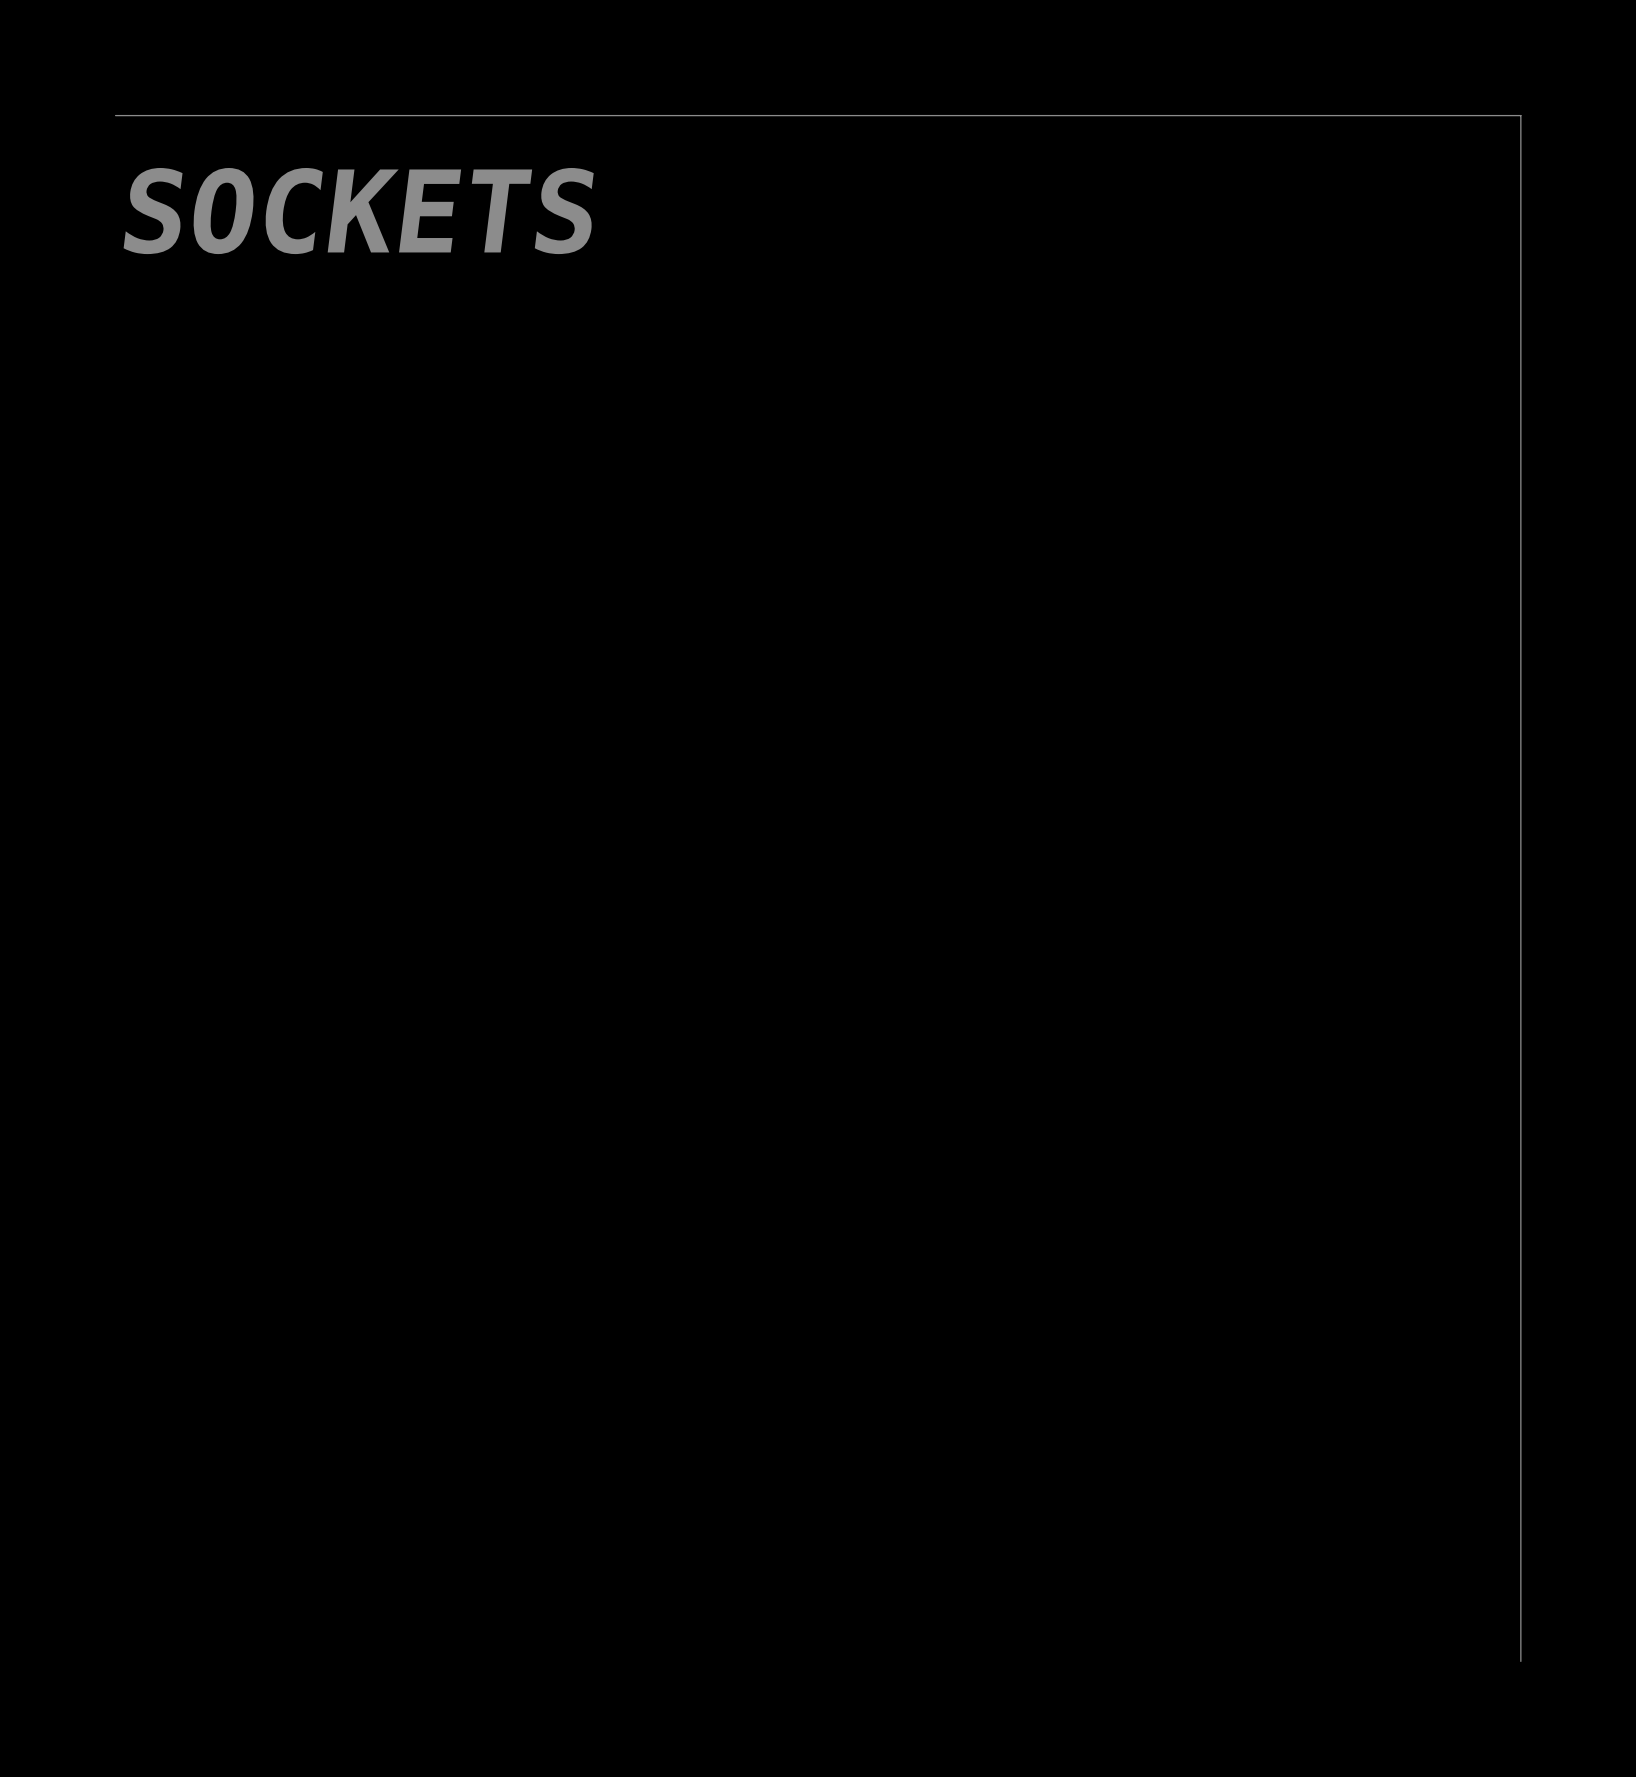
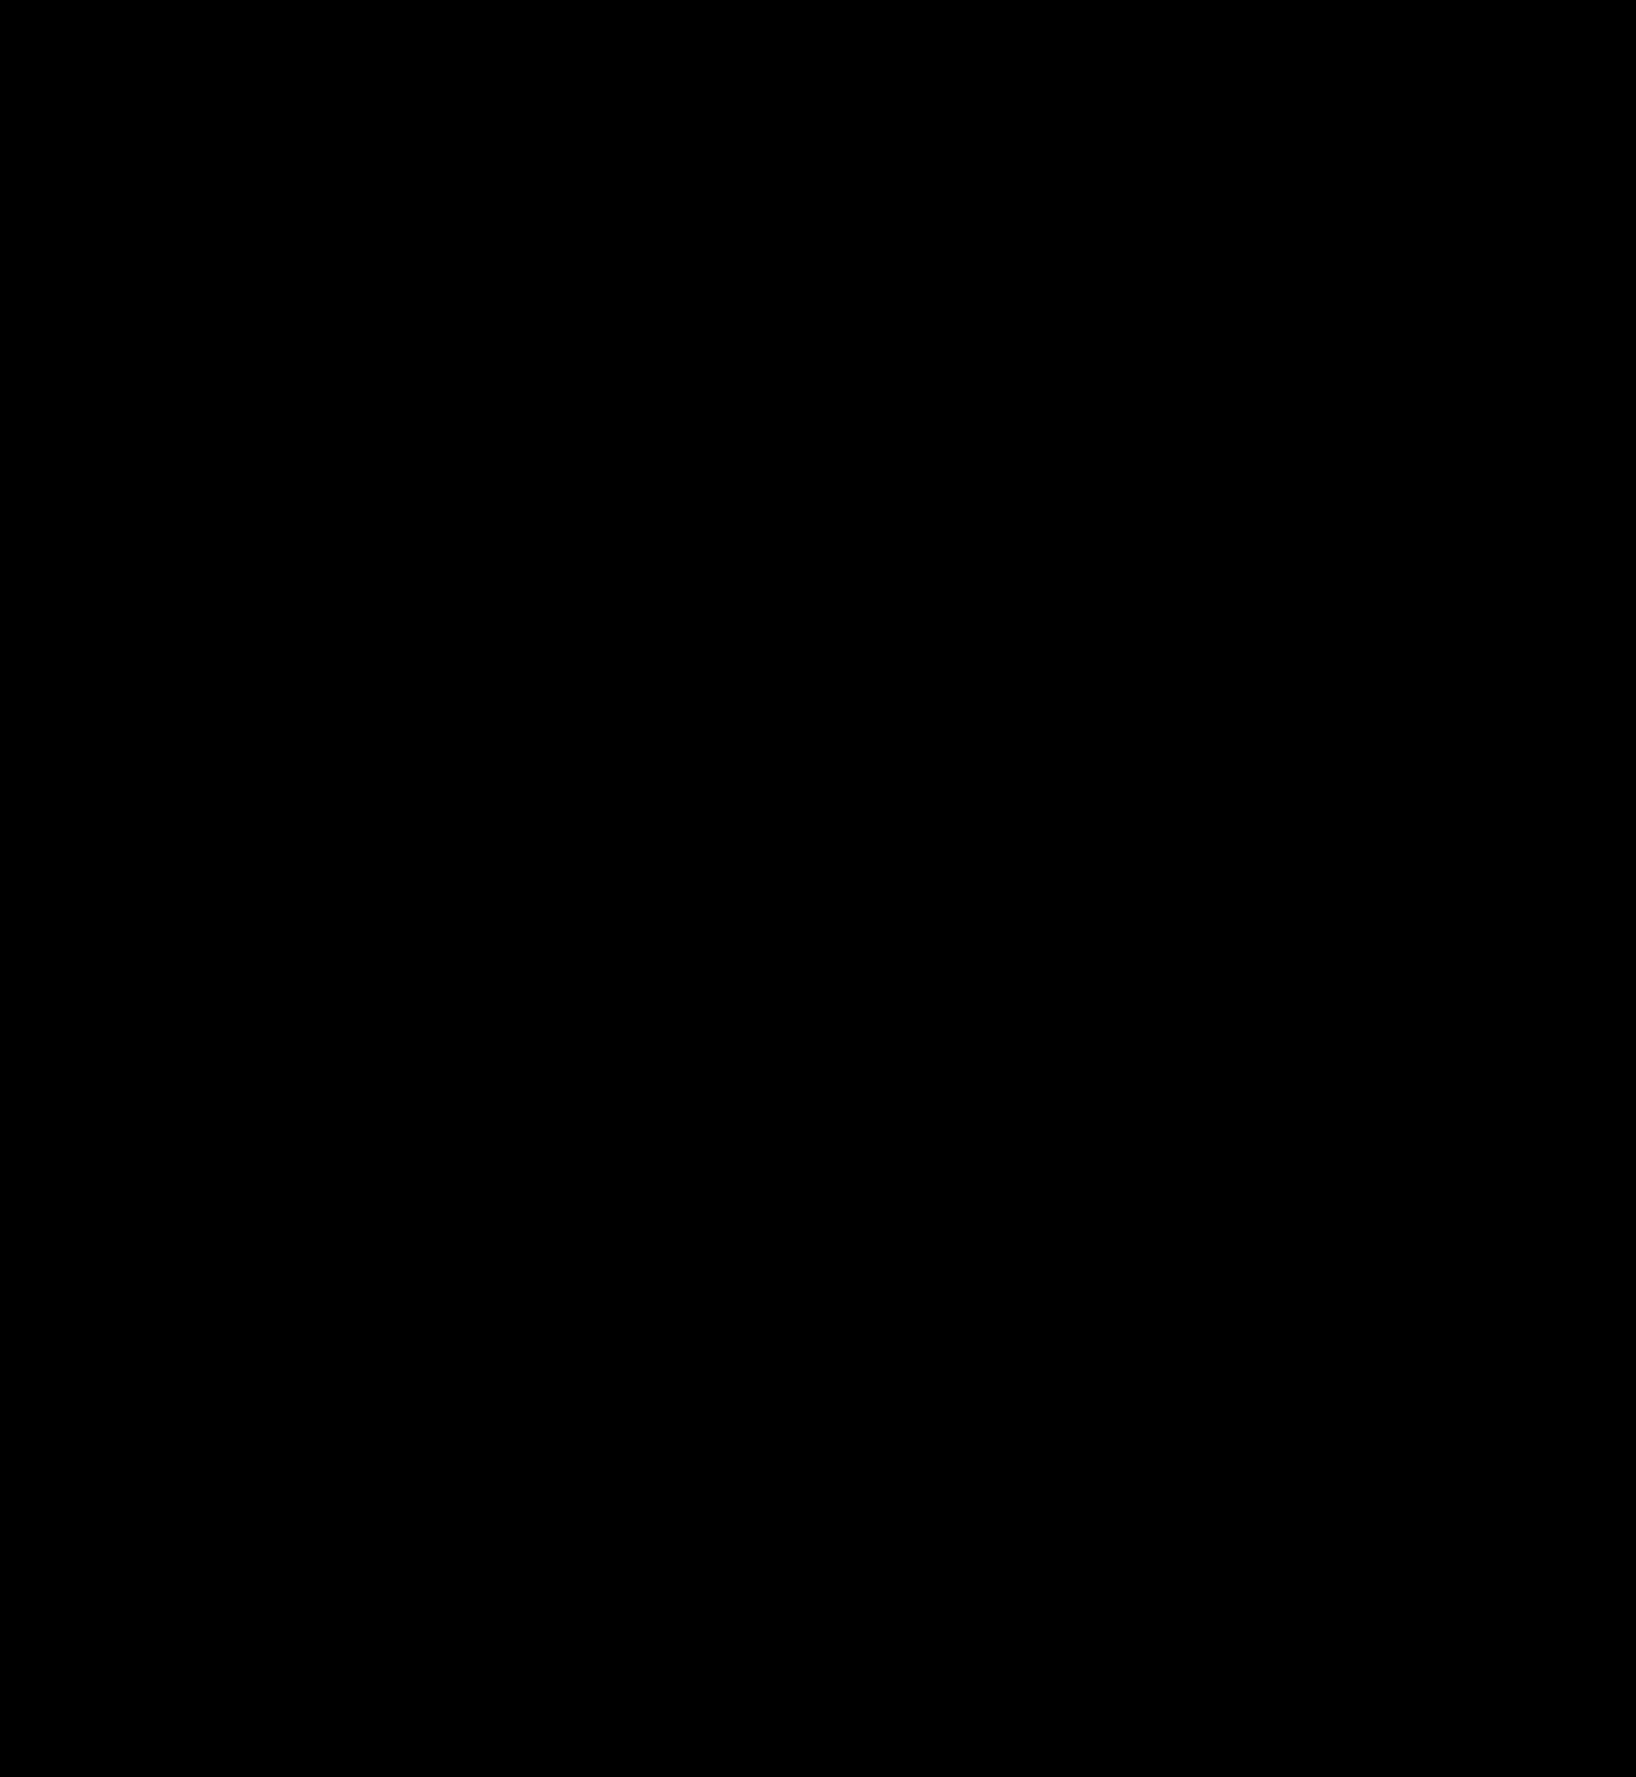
line: (115, 115) (1520, 115) (1520, 1661) -> none
text: SOCKETS (358, 211) -> none

